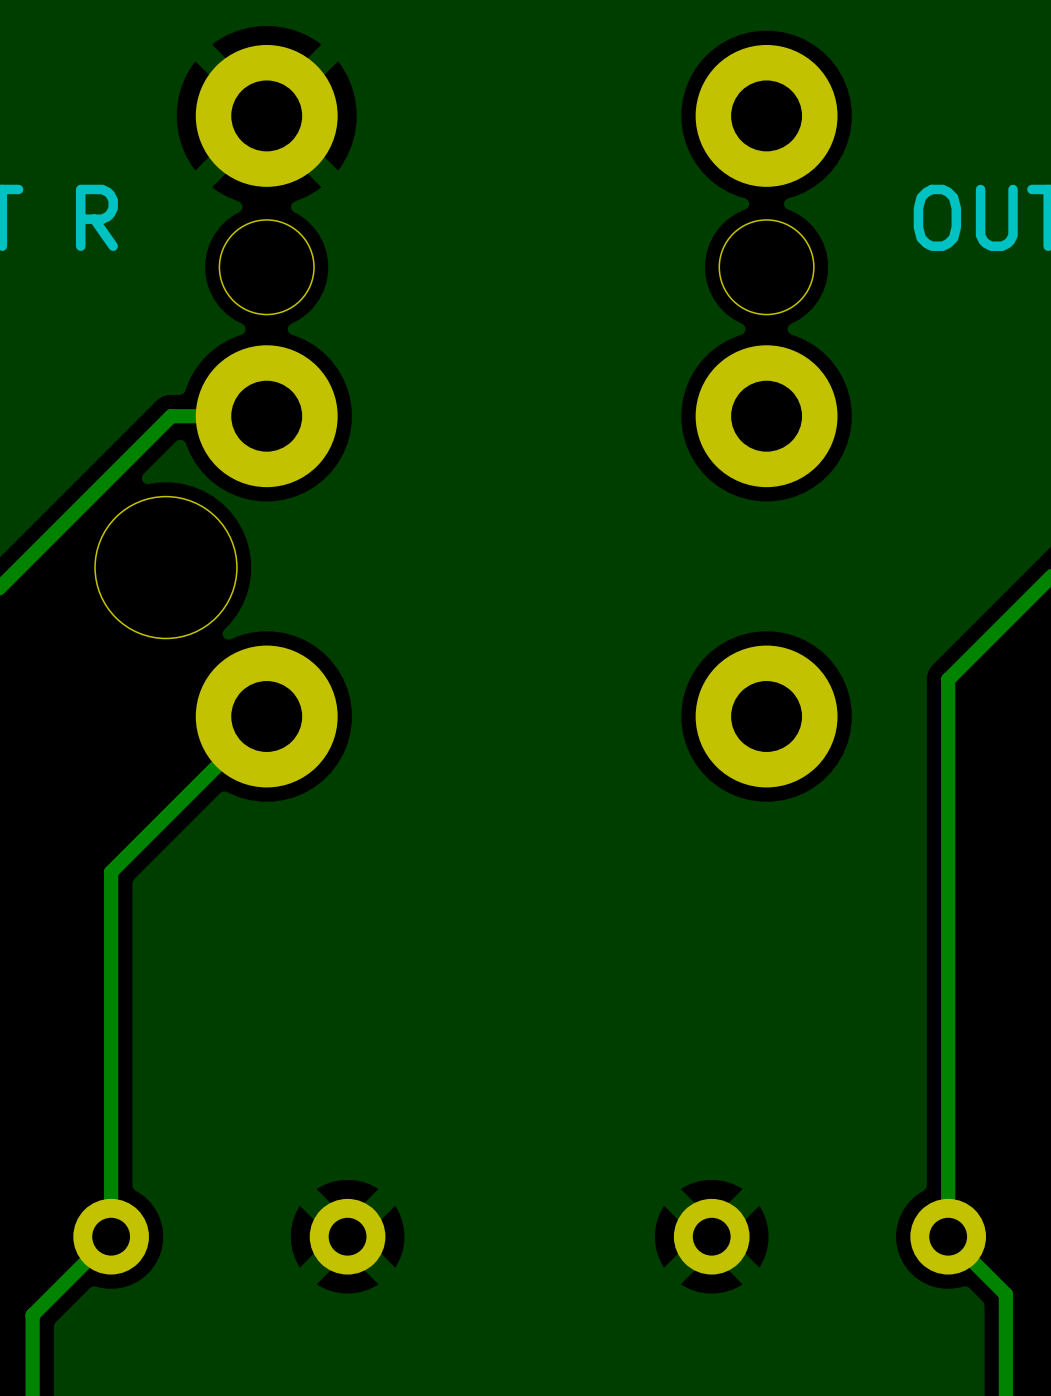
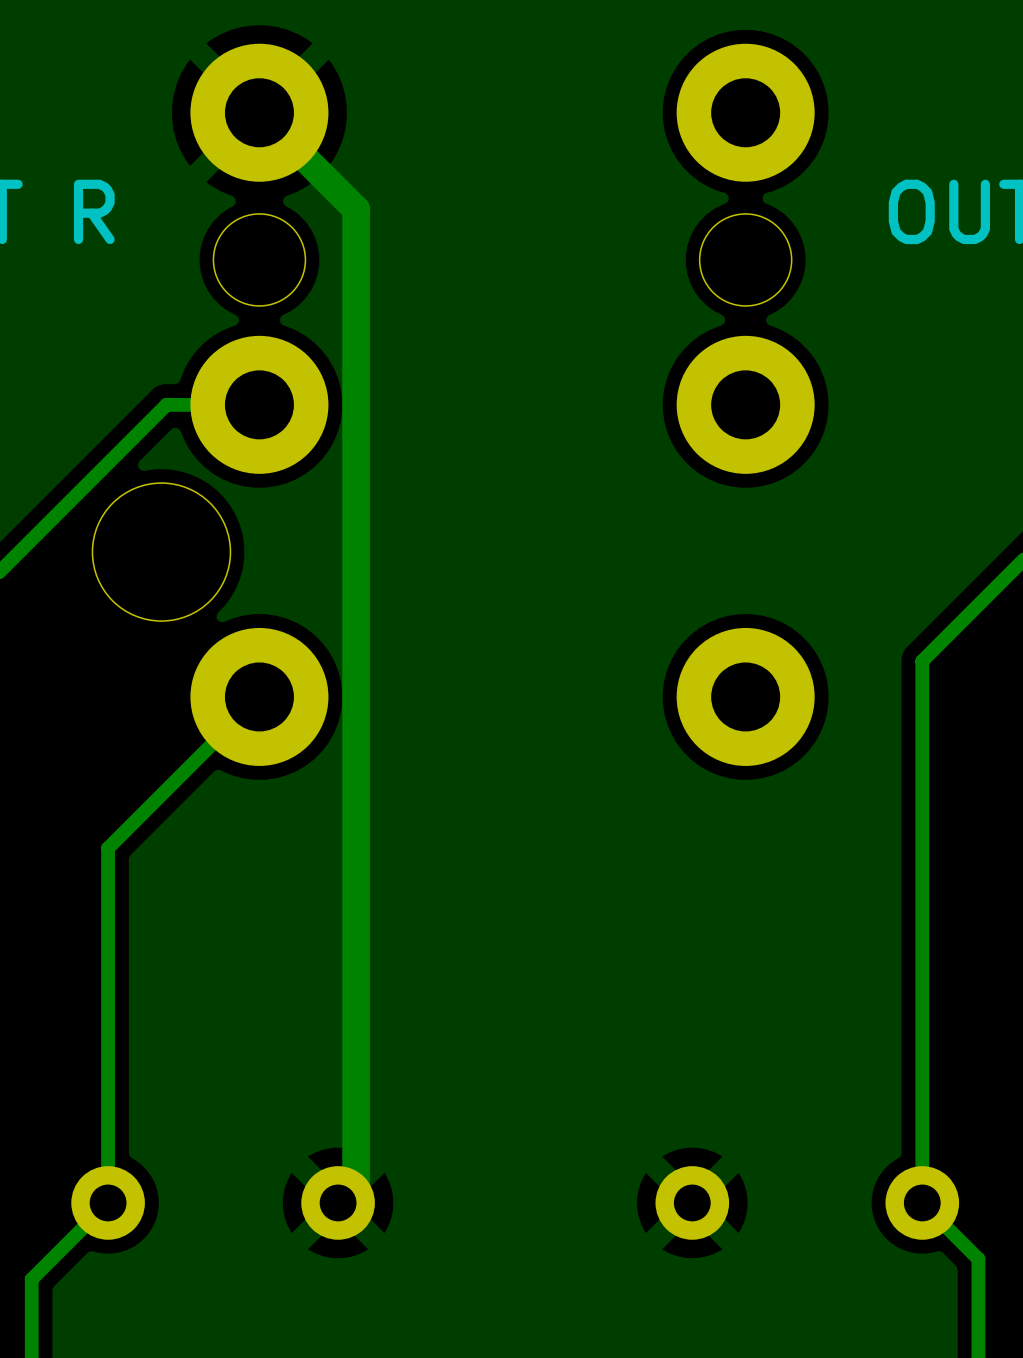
track: none -> (259, 112) (356, 209) (356, 1184) (338, 1202)

